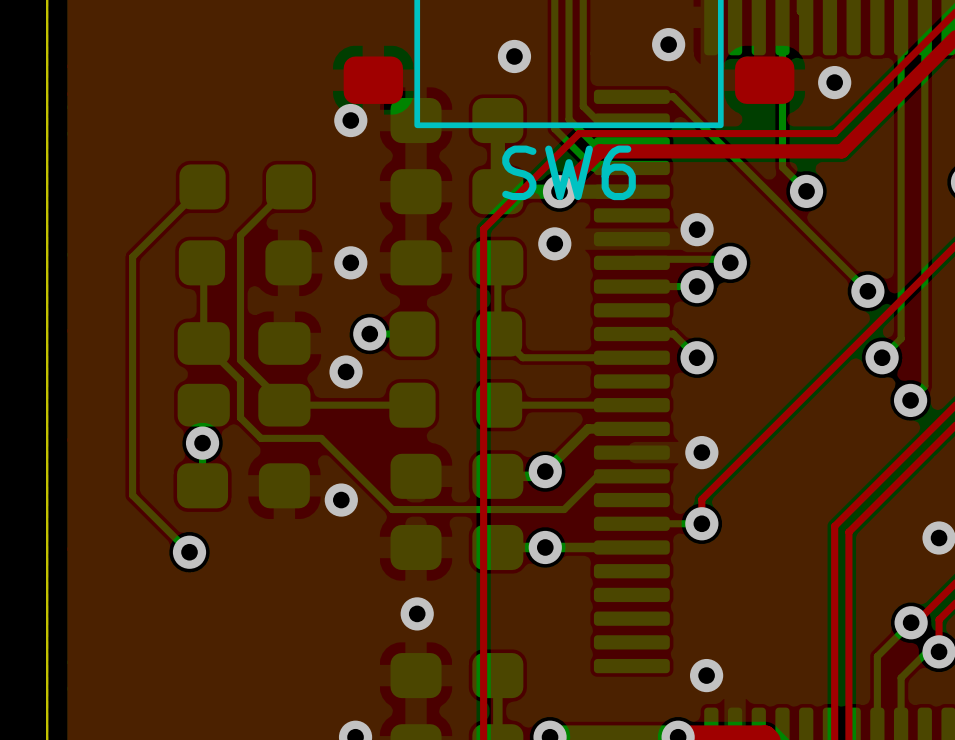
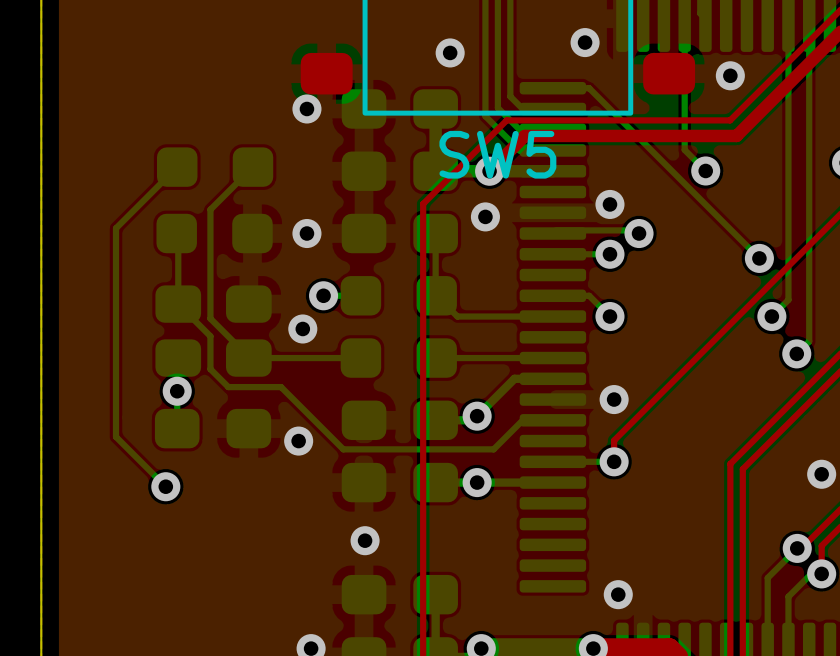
SW6 name: SW6 (569, 172) -> SW5 (497, 154)

